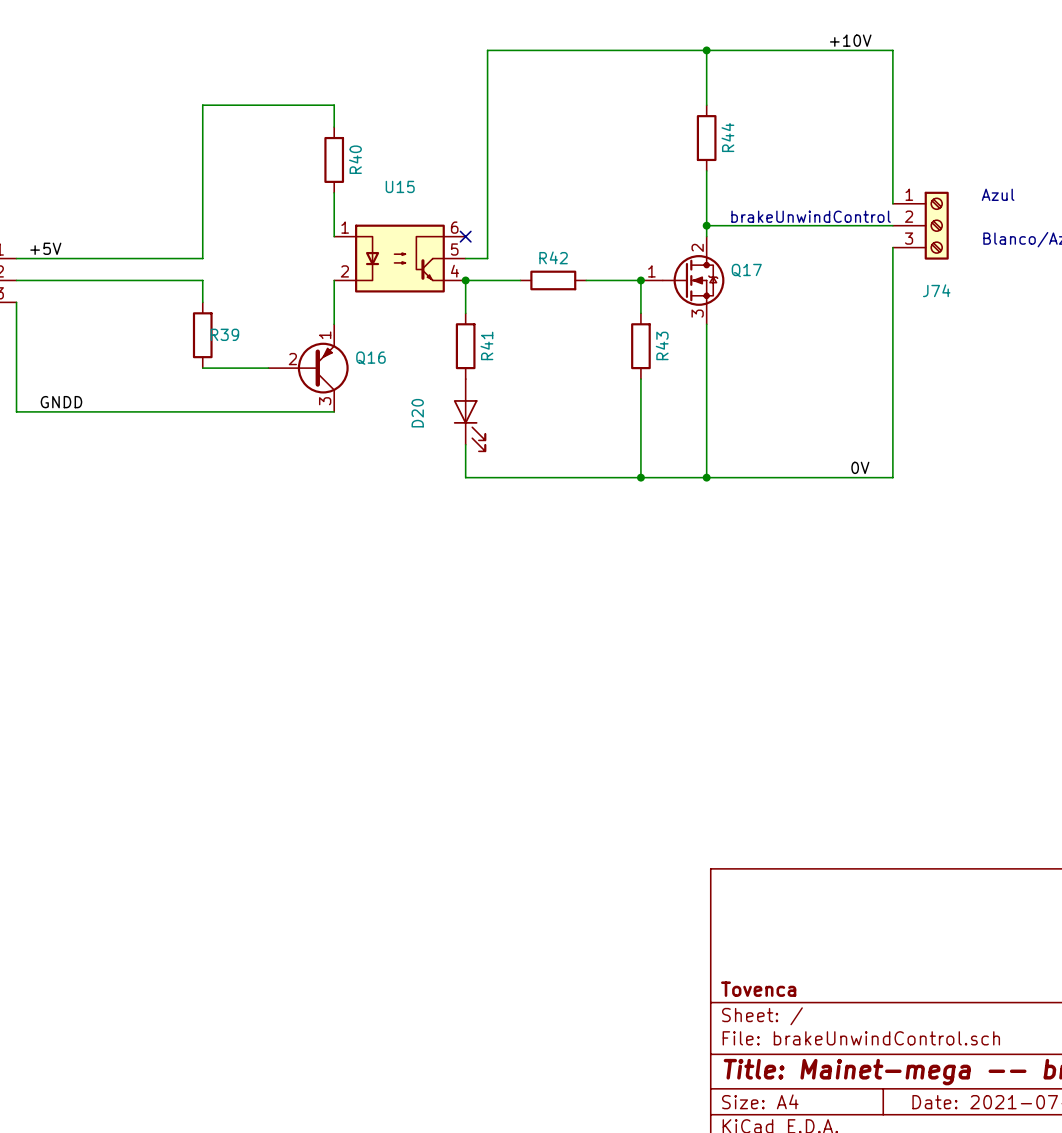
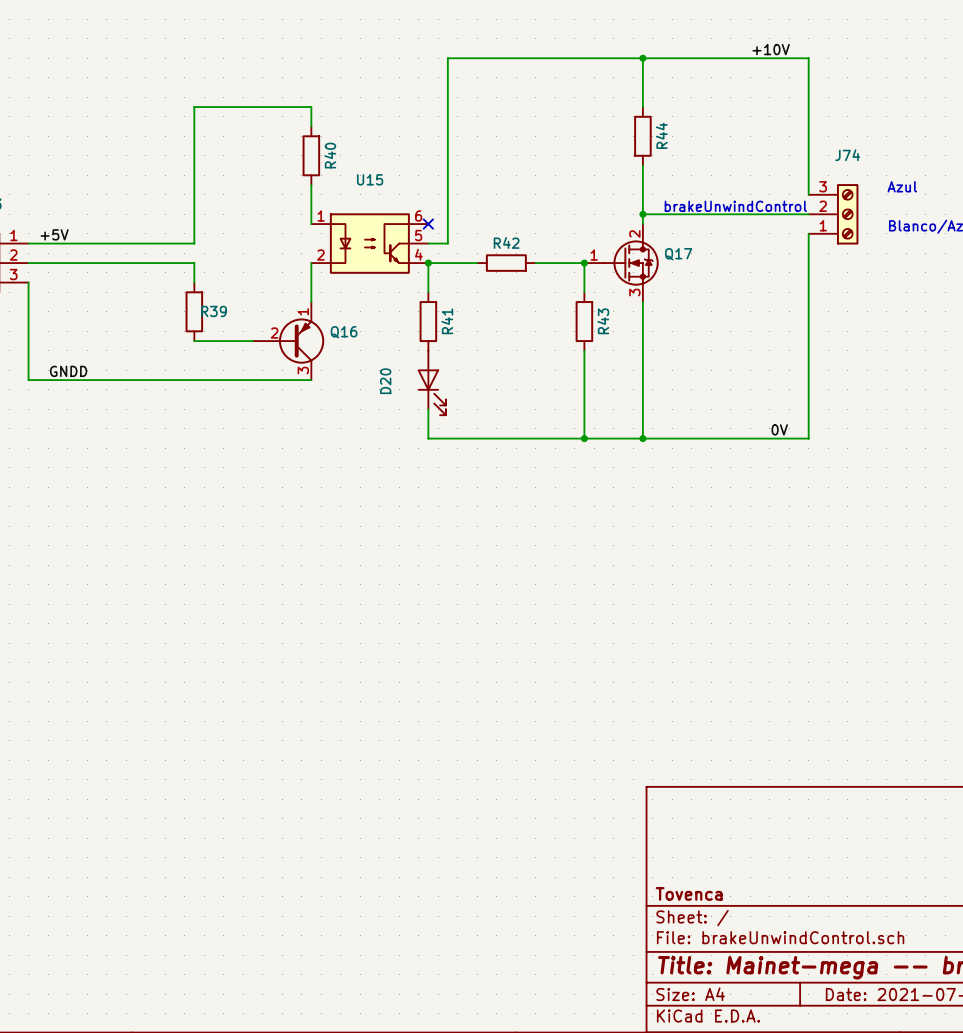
J74 flip: as is (936, 225) -> up-down (847, 214)

